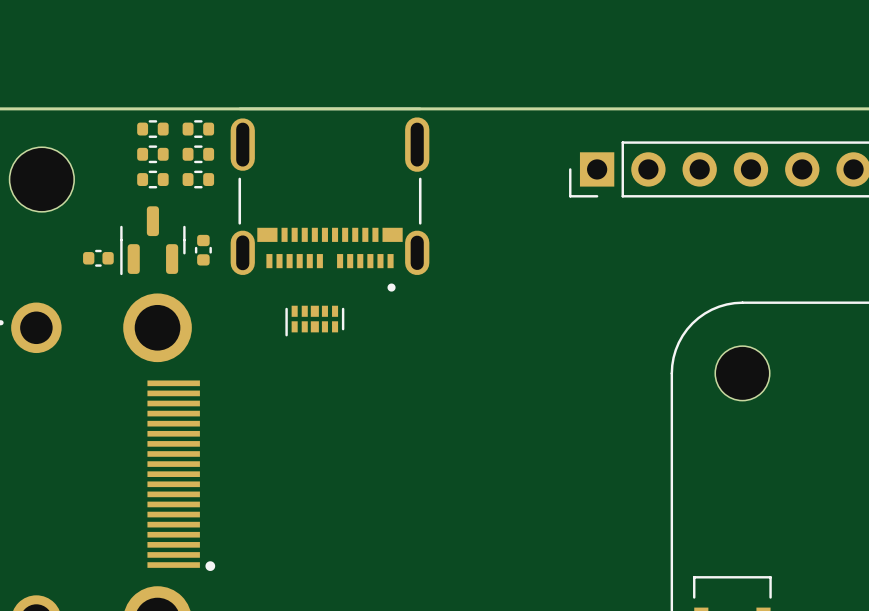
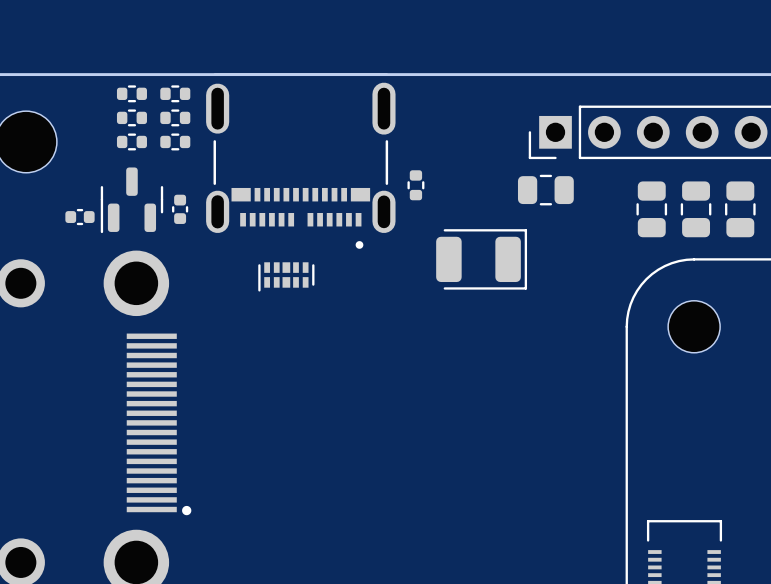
part: none -> (415, 185)
part: none -> (545, 190)
part: none -> (651, 209)
part: none -> (696, 209)
part: none -> (740, 209)
part: none -> (481, 259)

